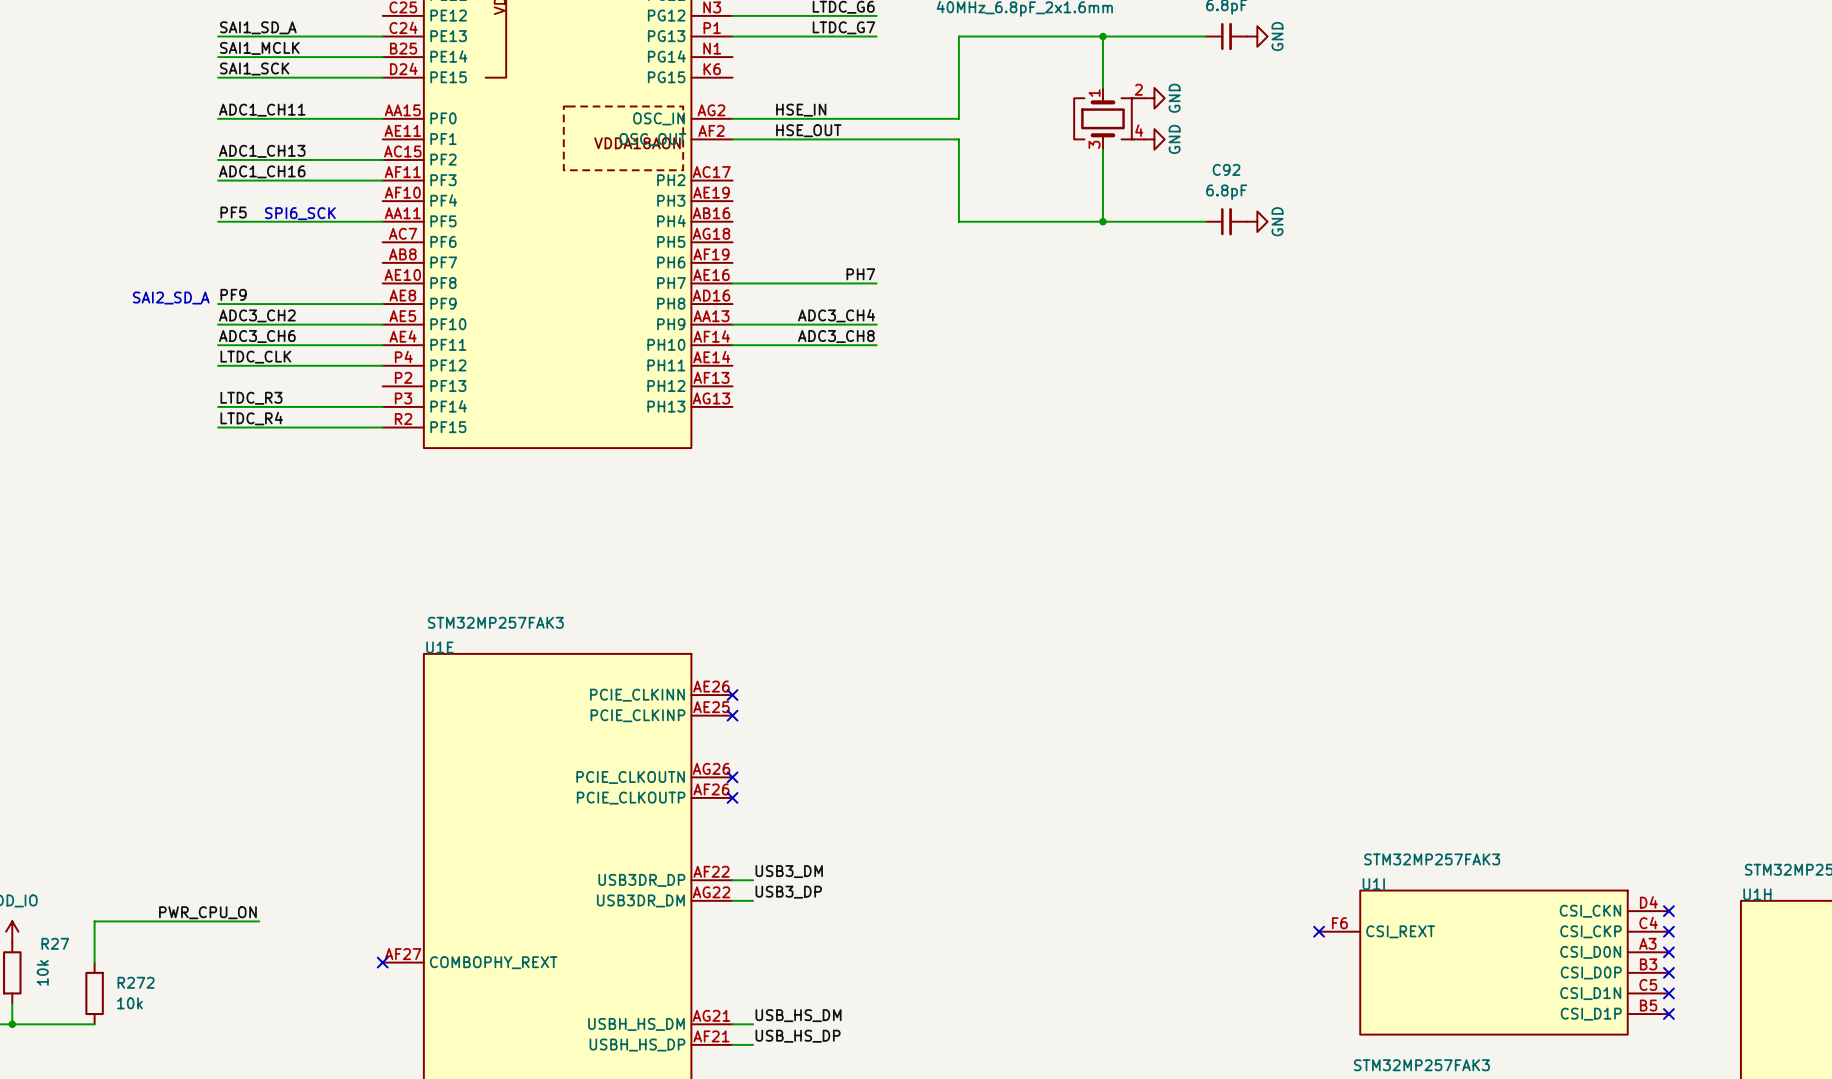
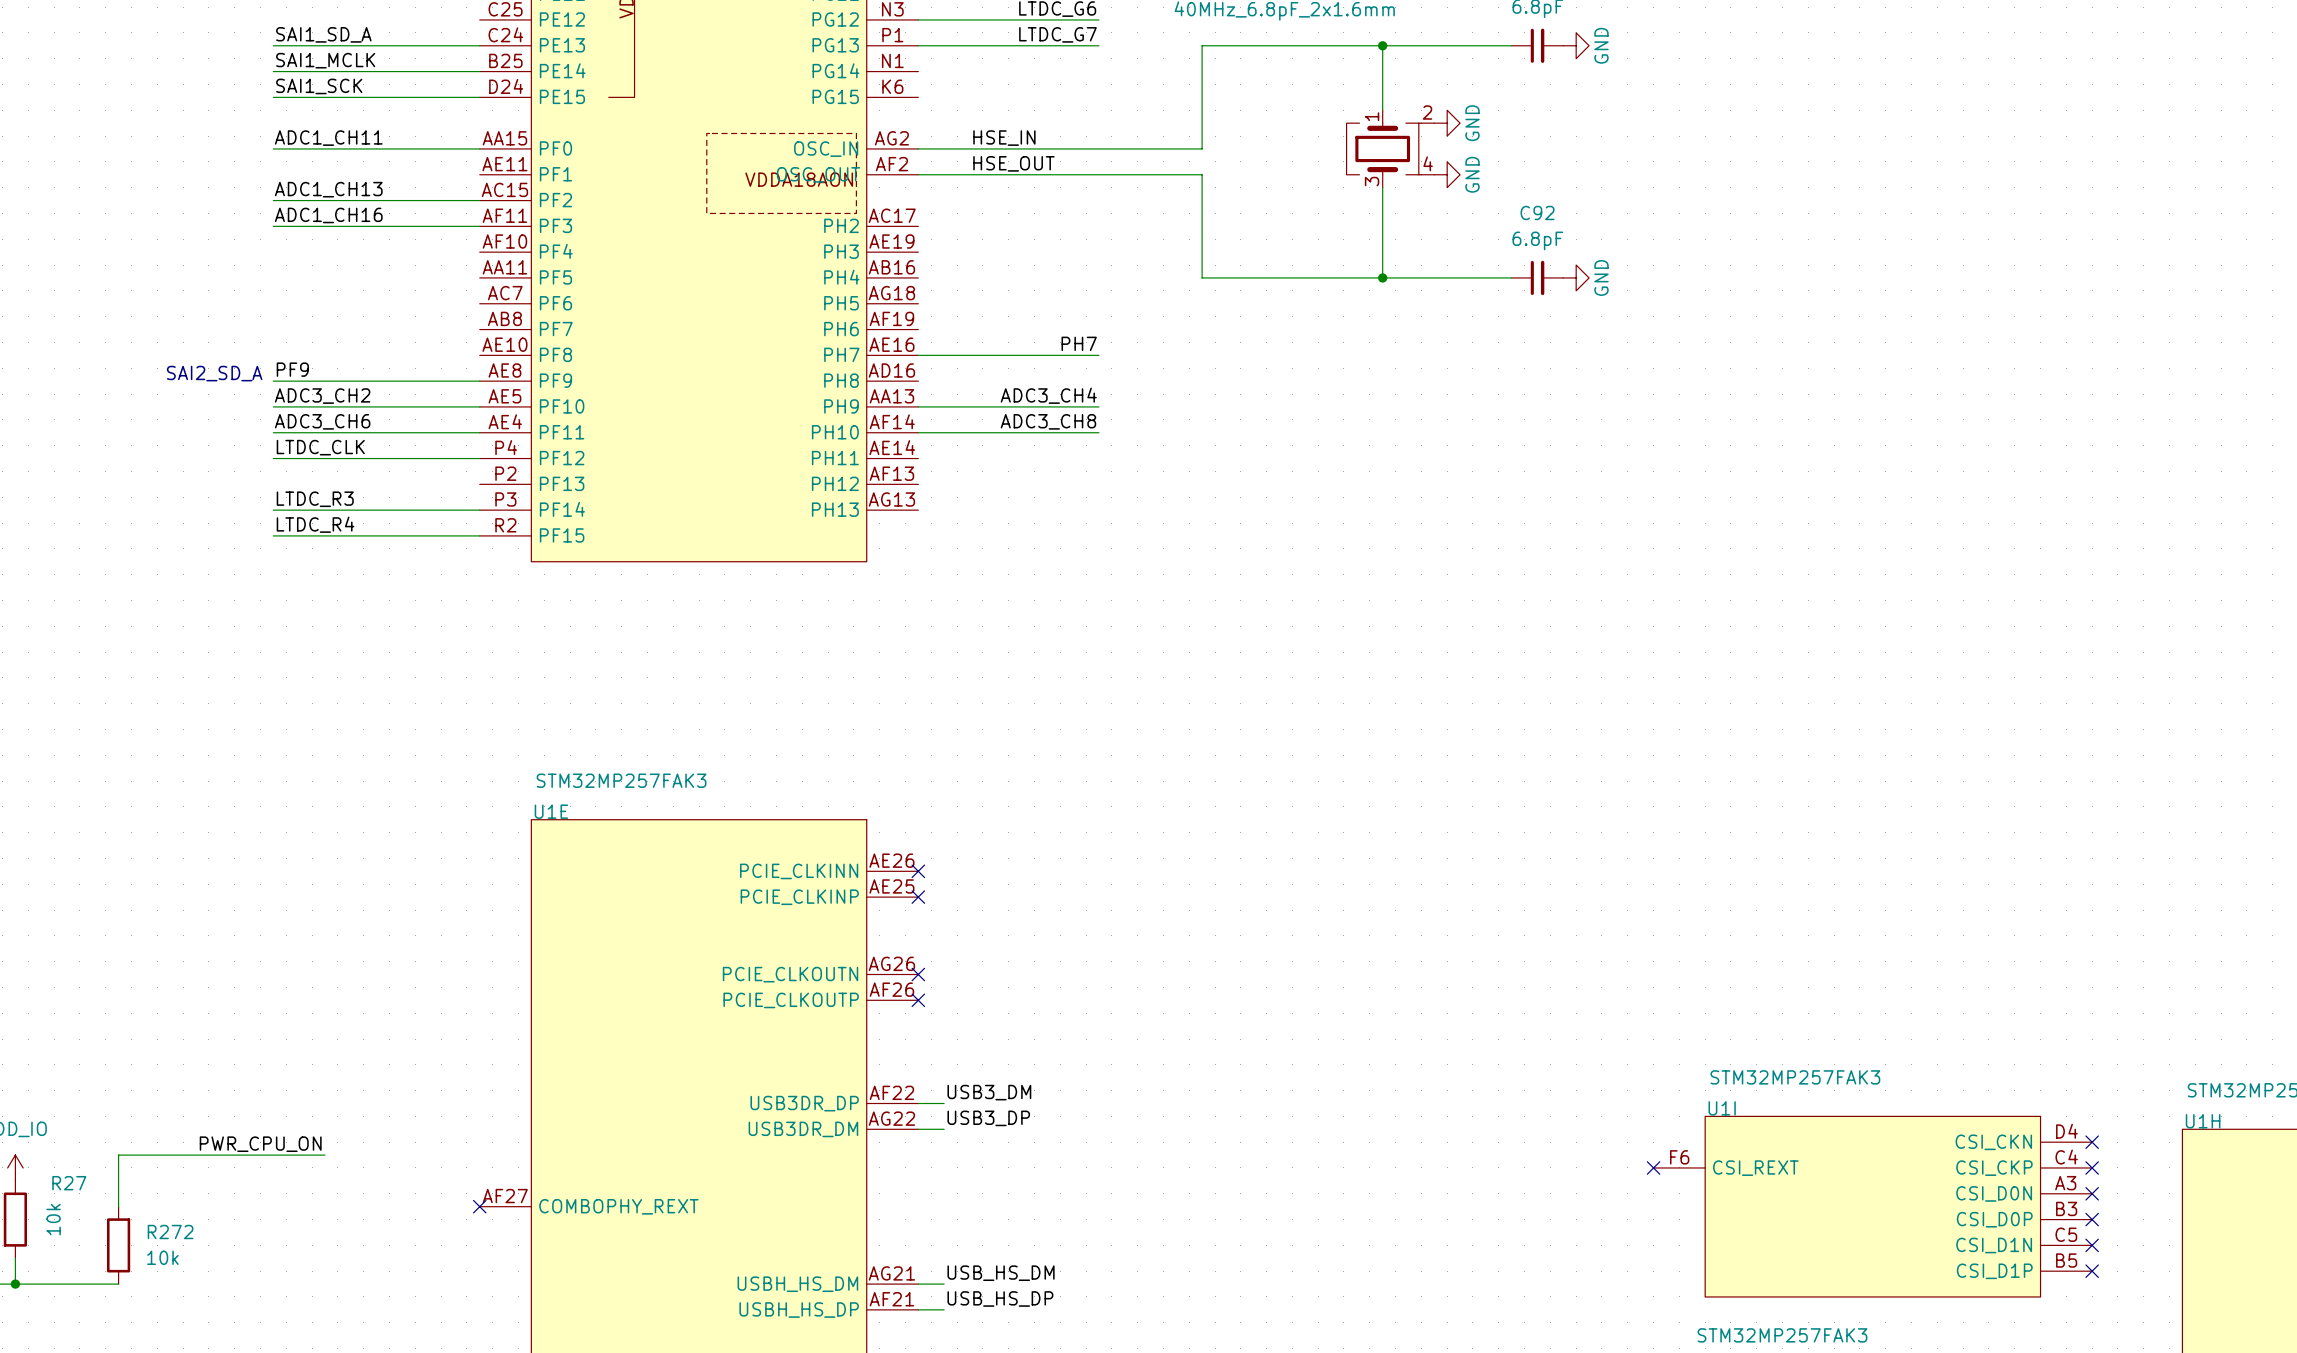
label: PF5 (233, 212) -> none
text: SPI6_SCK (300, 213) -> none
wire: (218, 221) (382, 221) -> none

